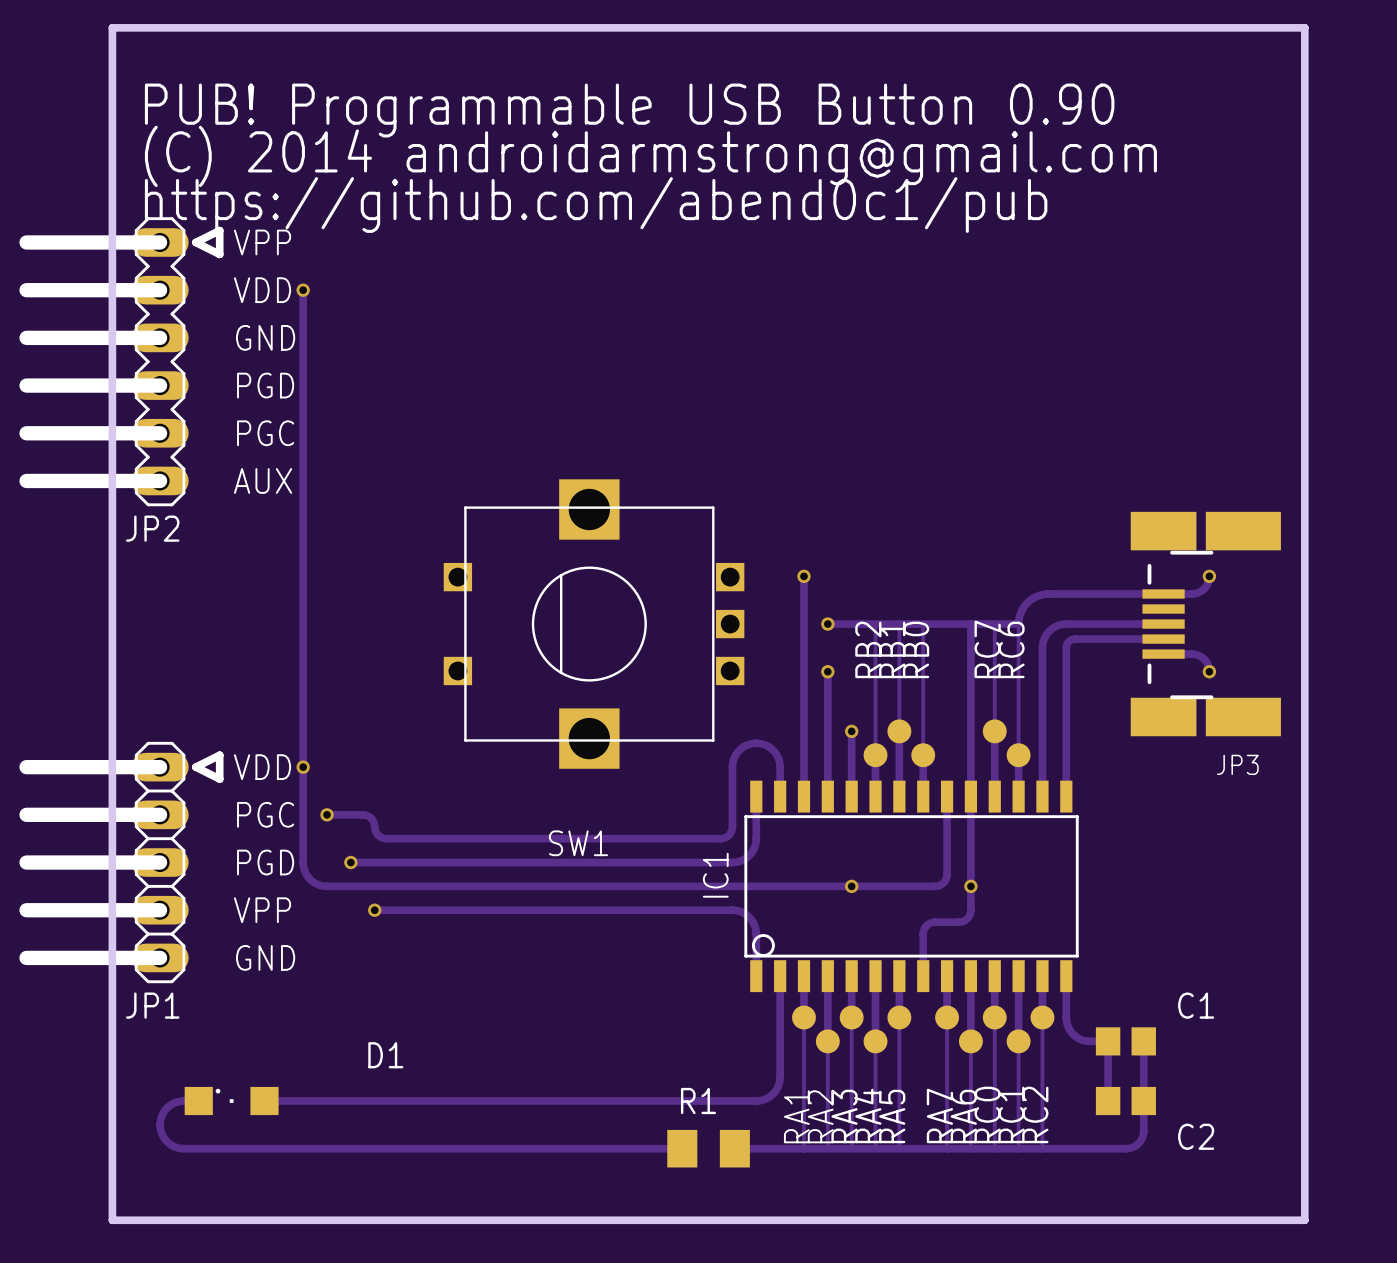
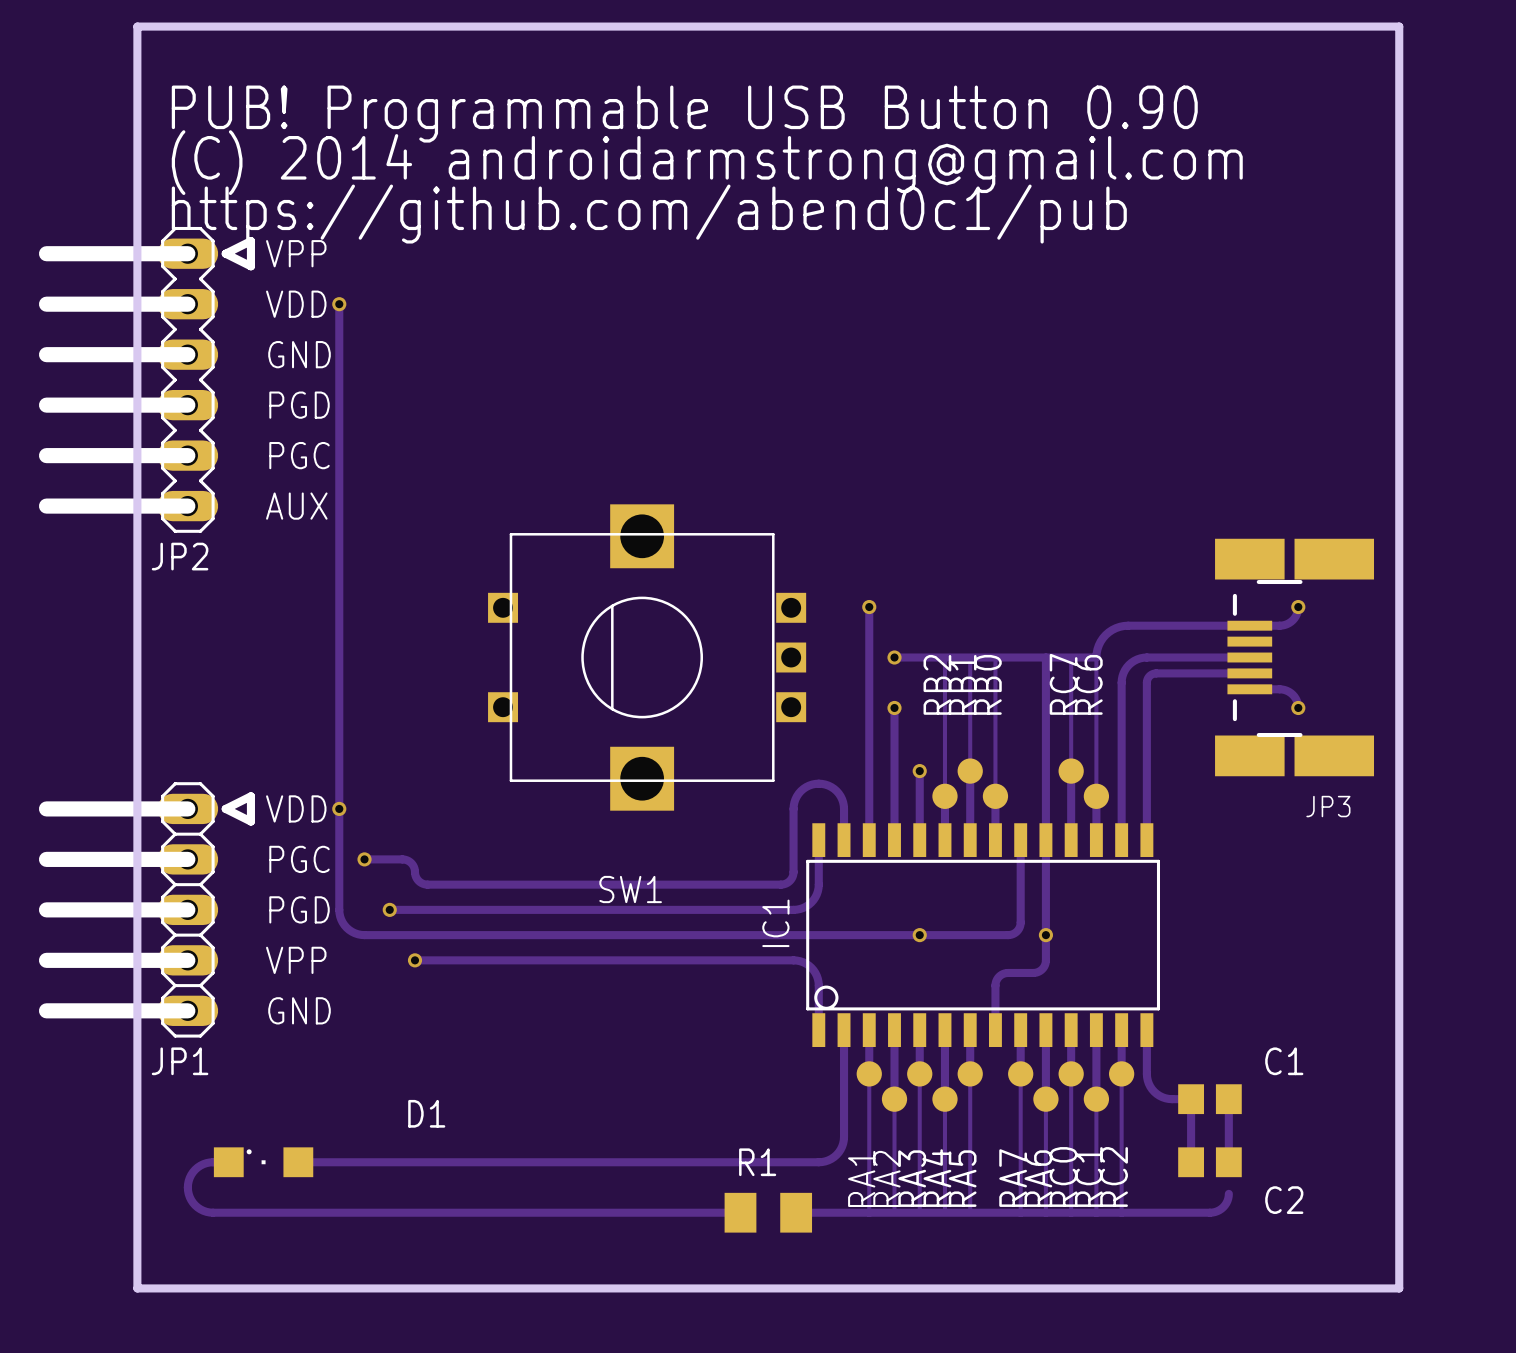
track: (1143, 1101) (1142, 1137) (1134, 1146) (1125, 1148) -> (1228, 1193) (1223, 1207) (1209, 1212)

